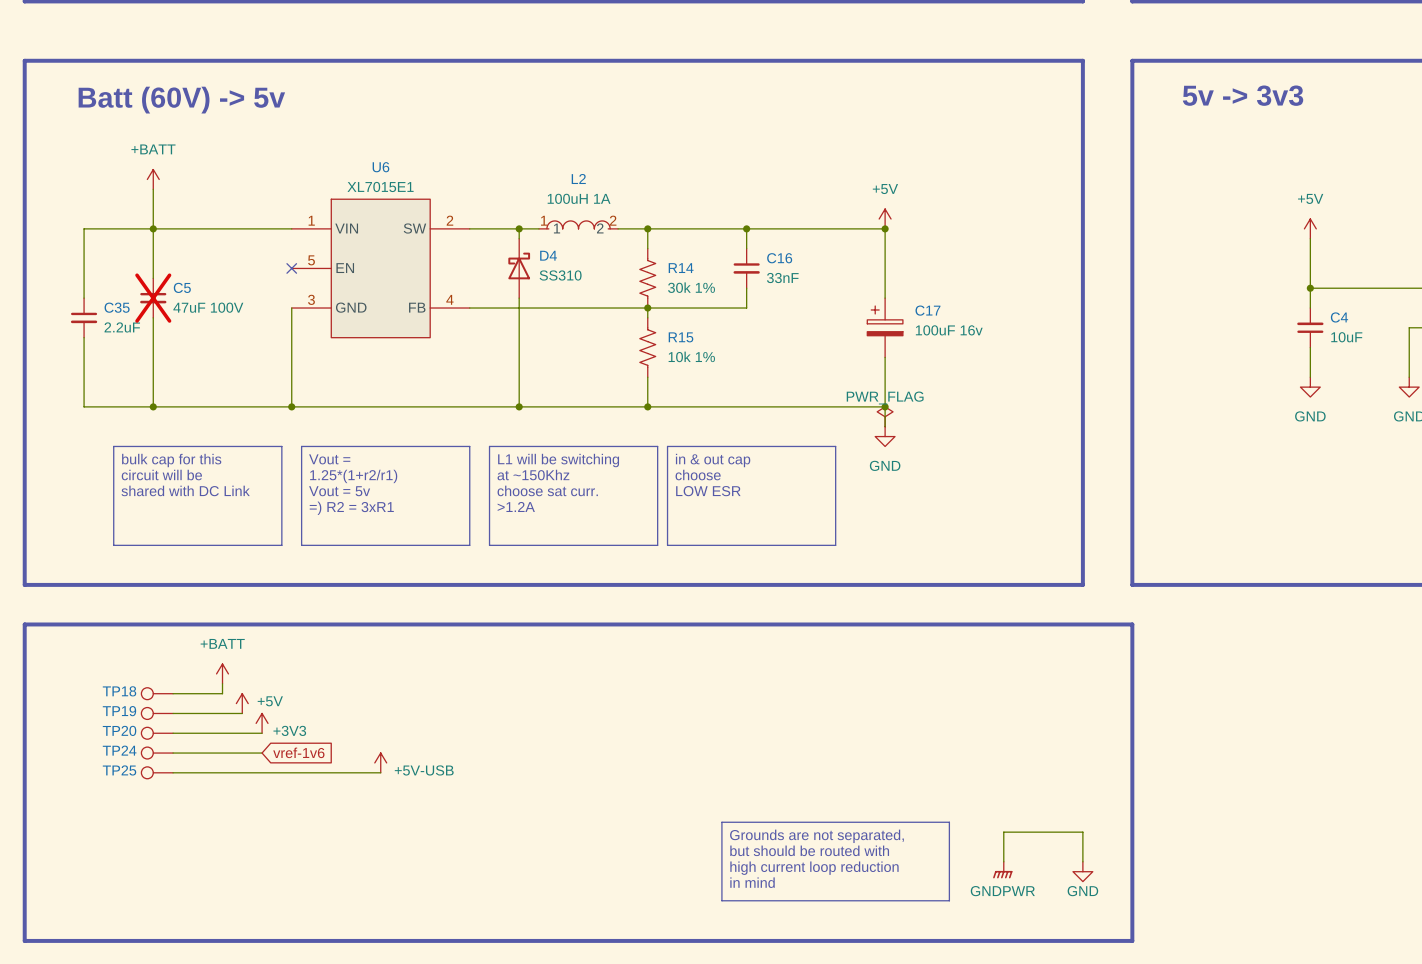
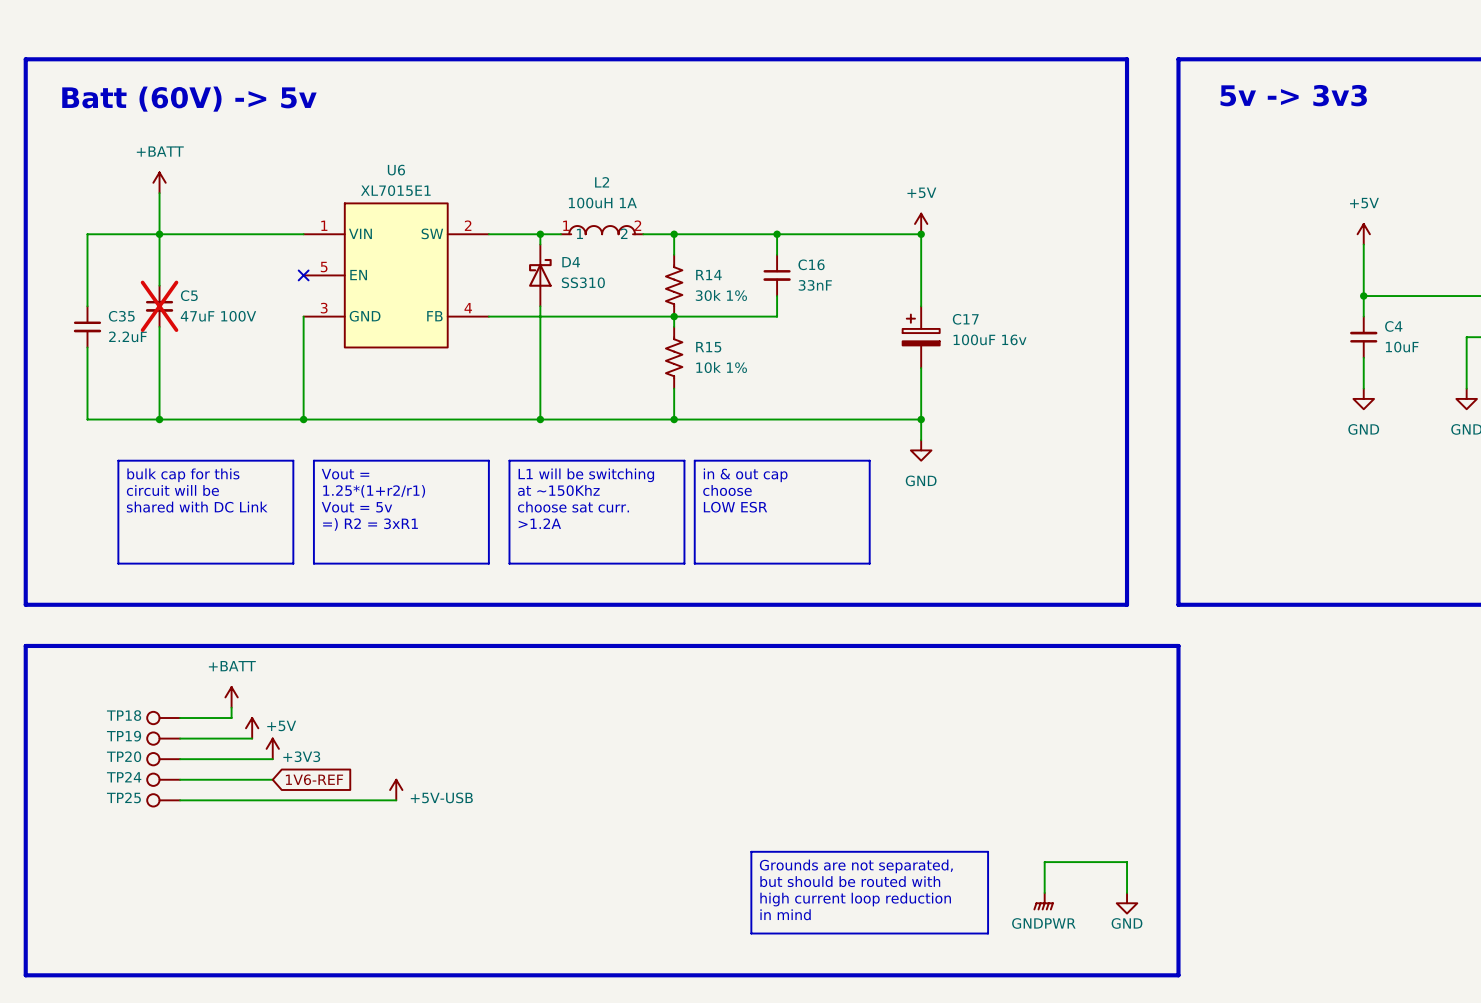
power symbol: PWR_FLAG (885, 416) -> none
global label: vref-1v6 (298, 752) -> 1V6-REF (314, 779)

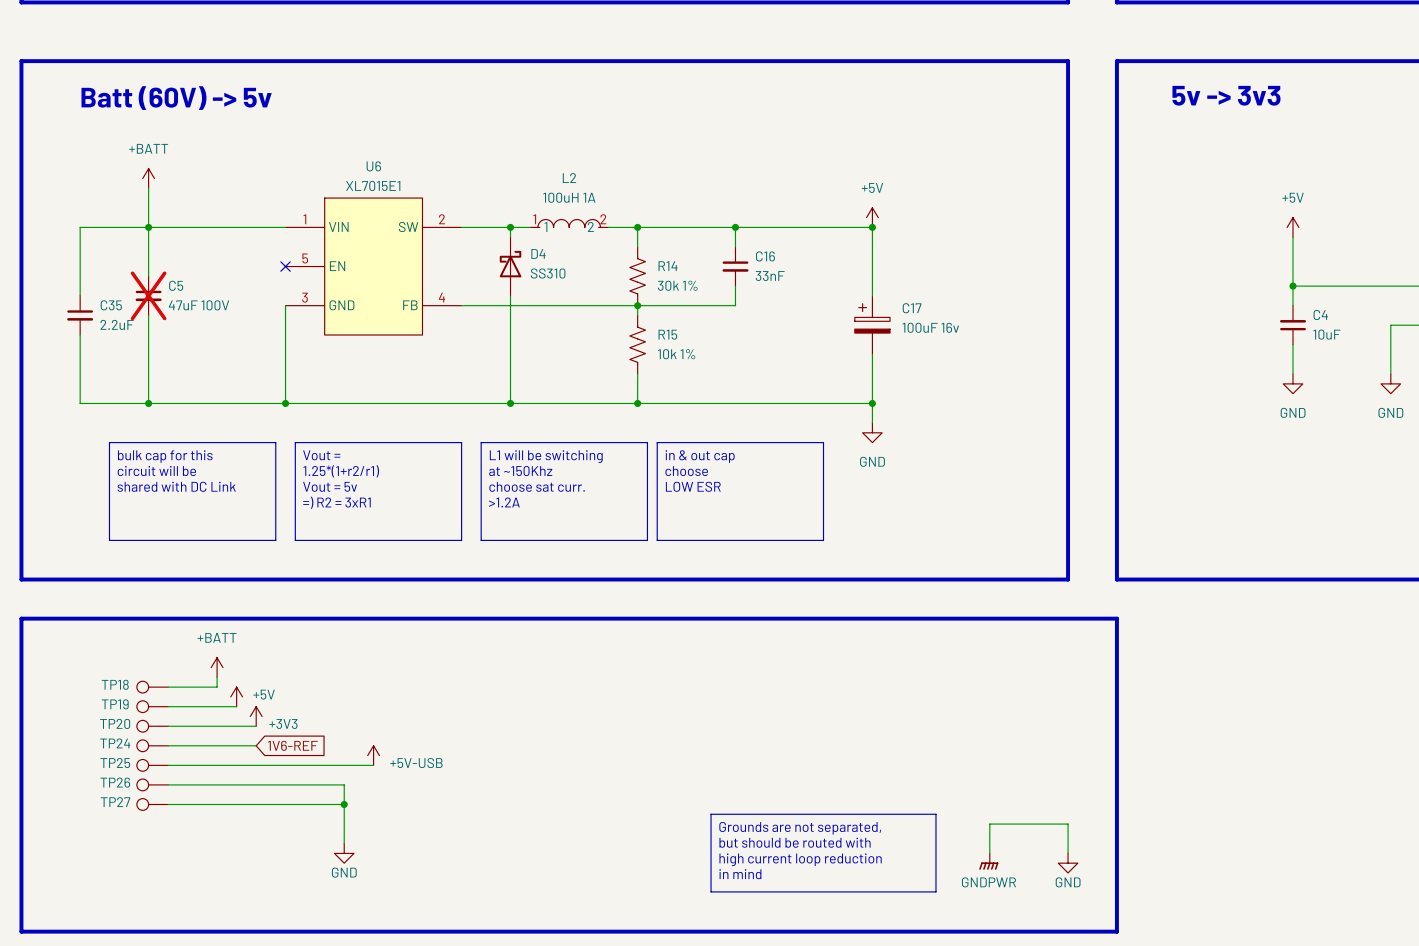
TP26: none -> (152, 784)
wire: none -> (168, 784) (344, 784) (344, 843)
TP27: none -> (152, 804)
wire: none -> (168, 804) (344, 804)
junction: none -> (344, 804)
power symbol: none -> GND (344, 853)

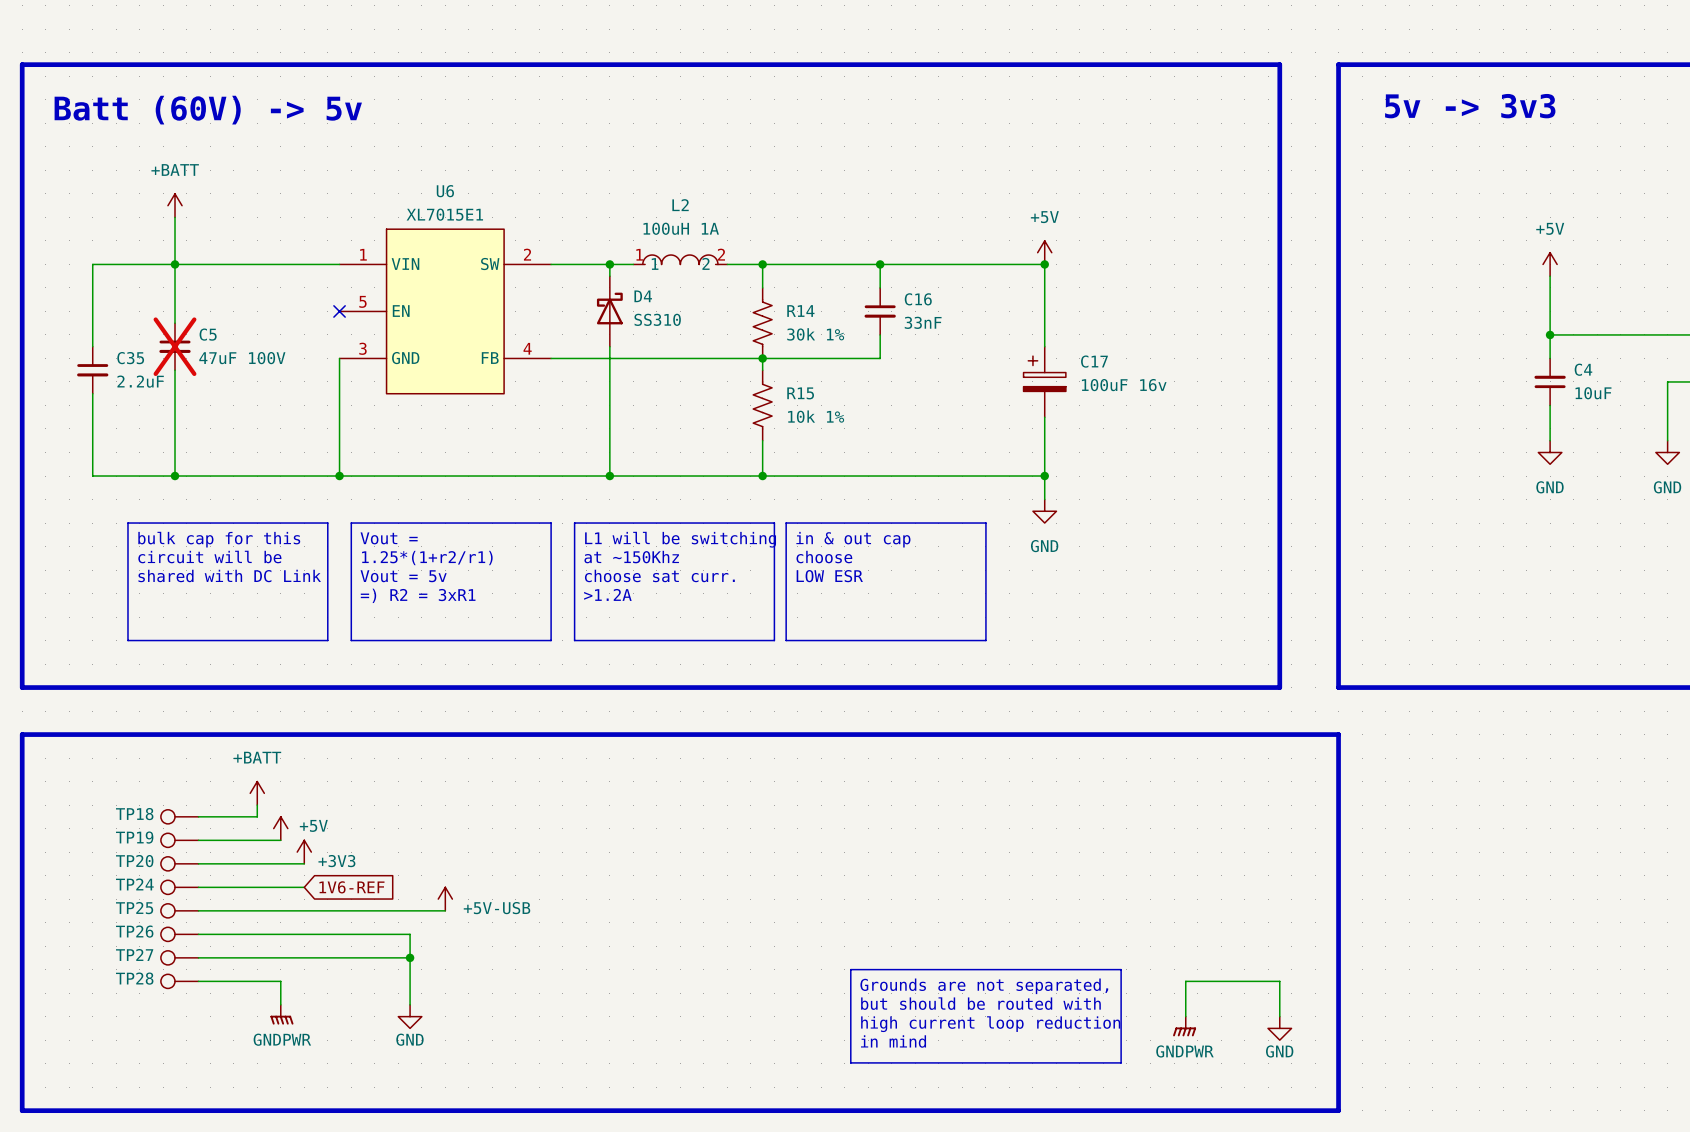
TP28: none -> (179, 981)
wire: none -> (198, 981) (280, 981) (280, 1004)
power symbol: none -> GNDPWR (281, 1014)

